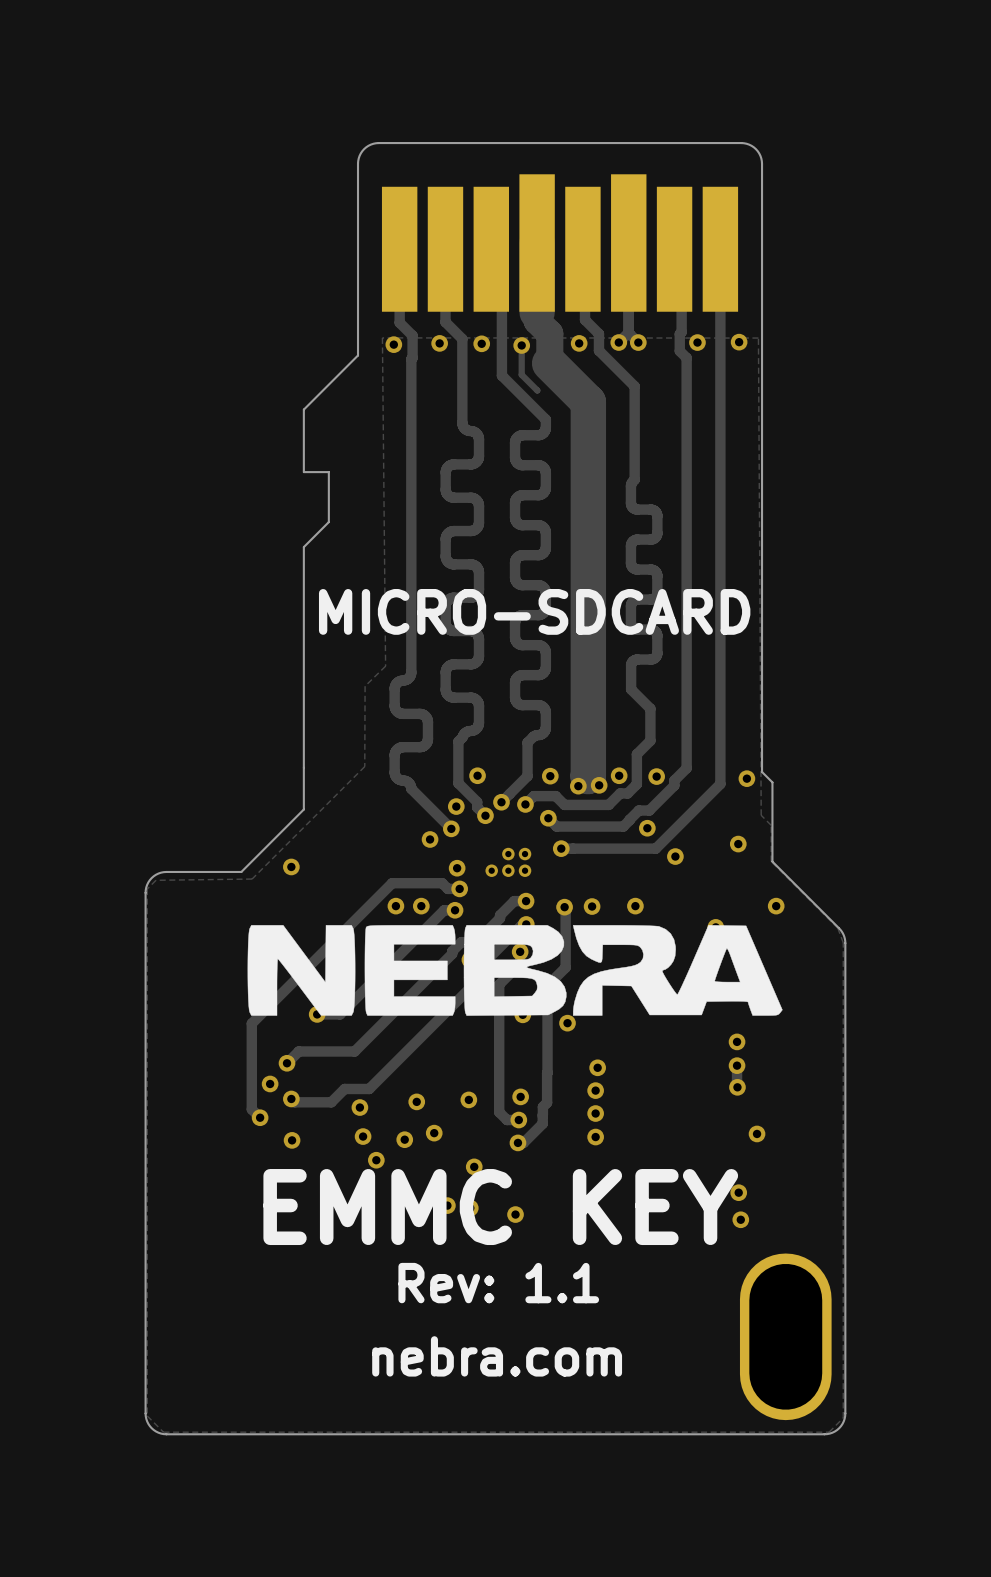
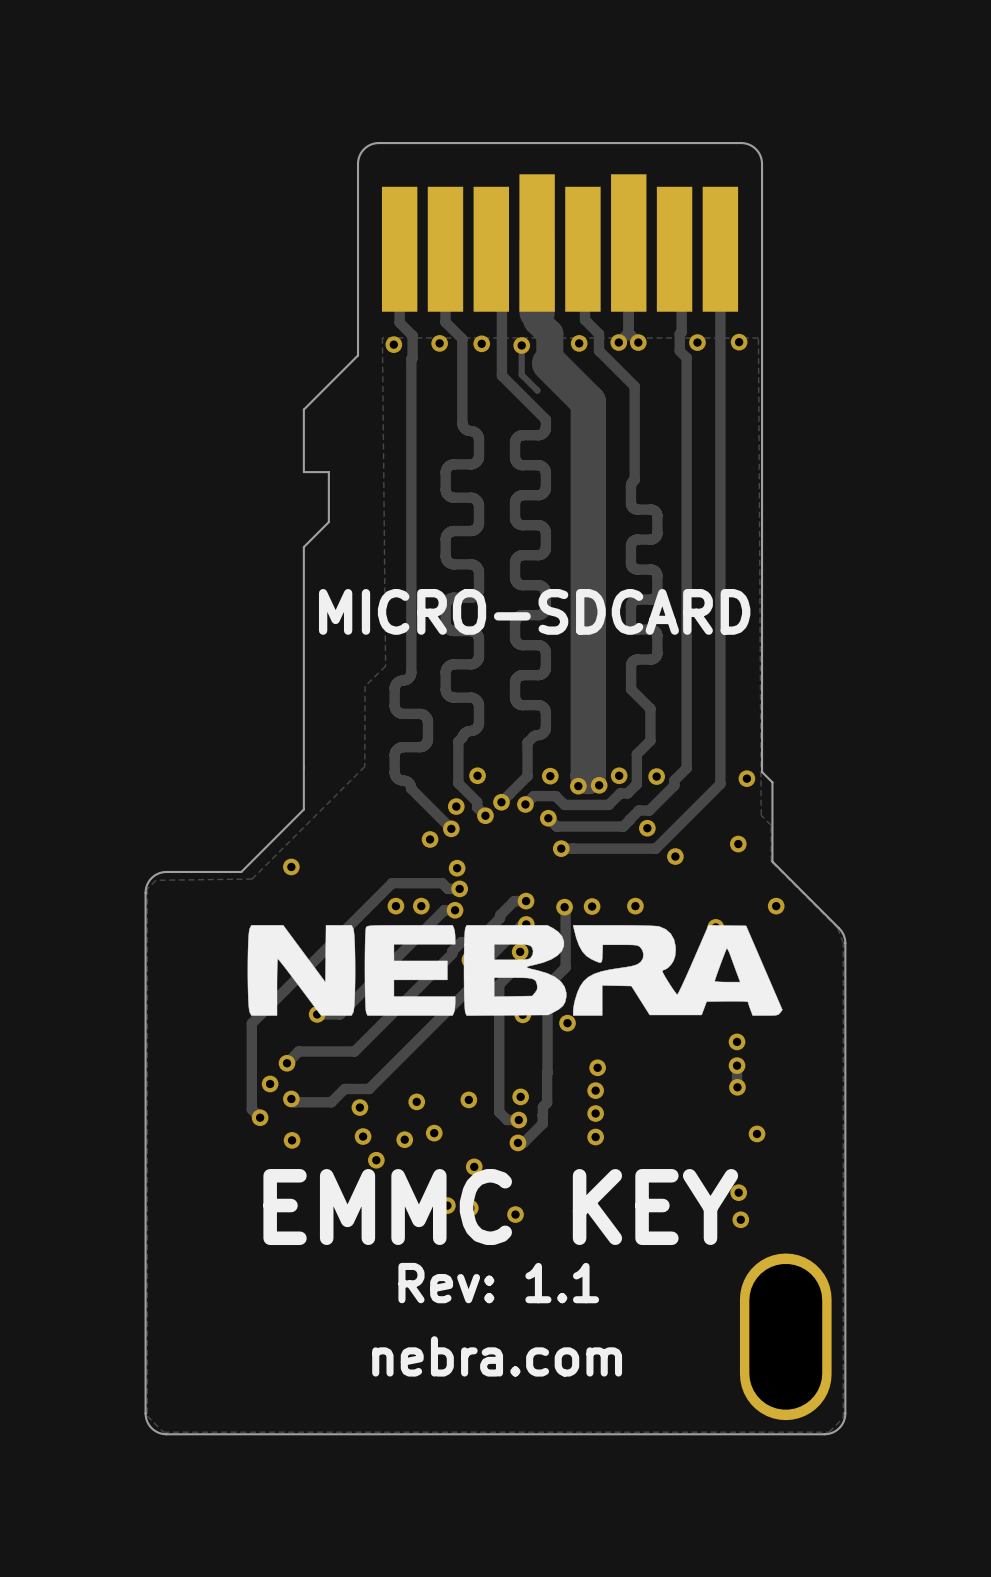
via: (508, 854) -> none
via: (525, 854) -> none
via: (491, 870) -> none
via: (508, 870) -> none
via: (525, 870) -> none

